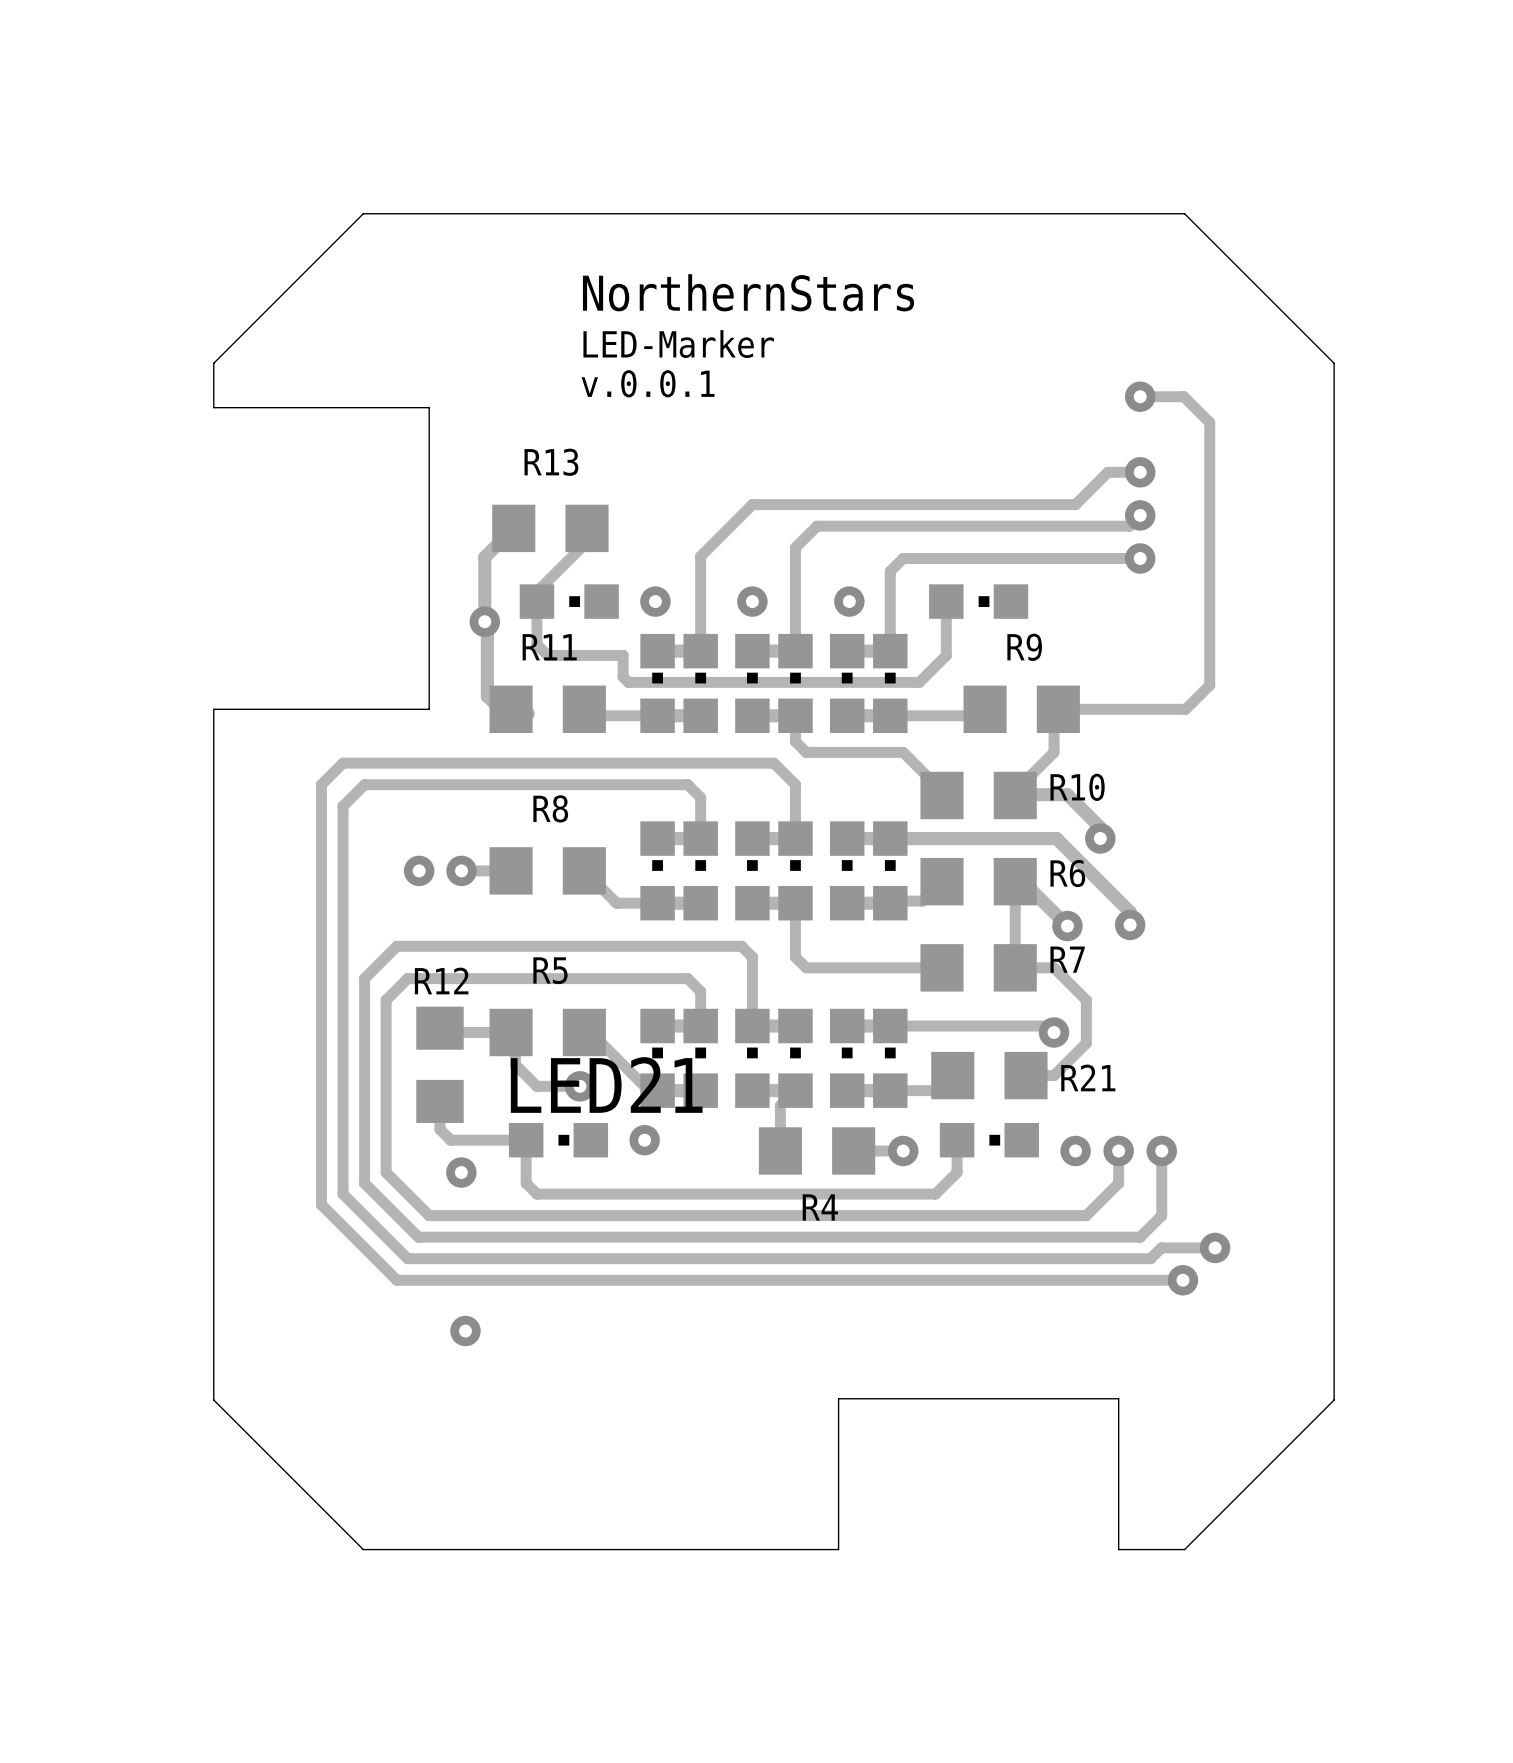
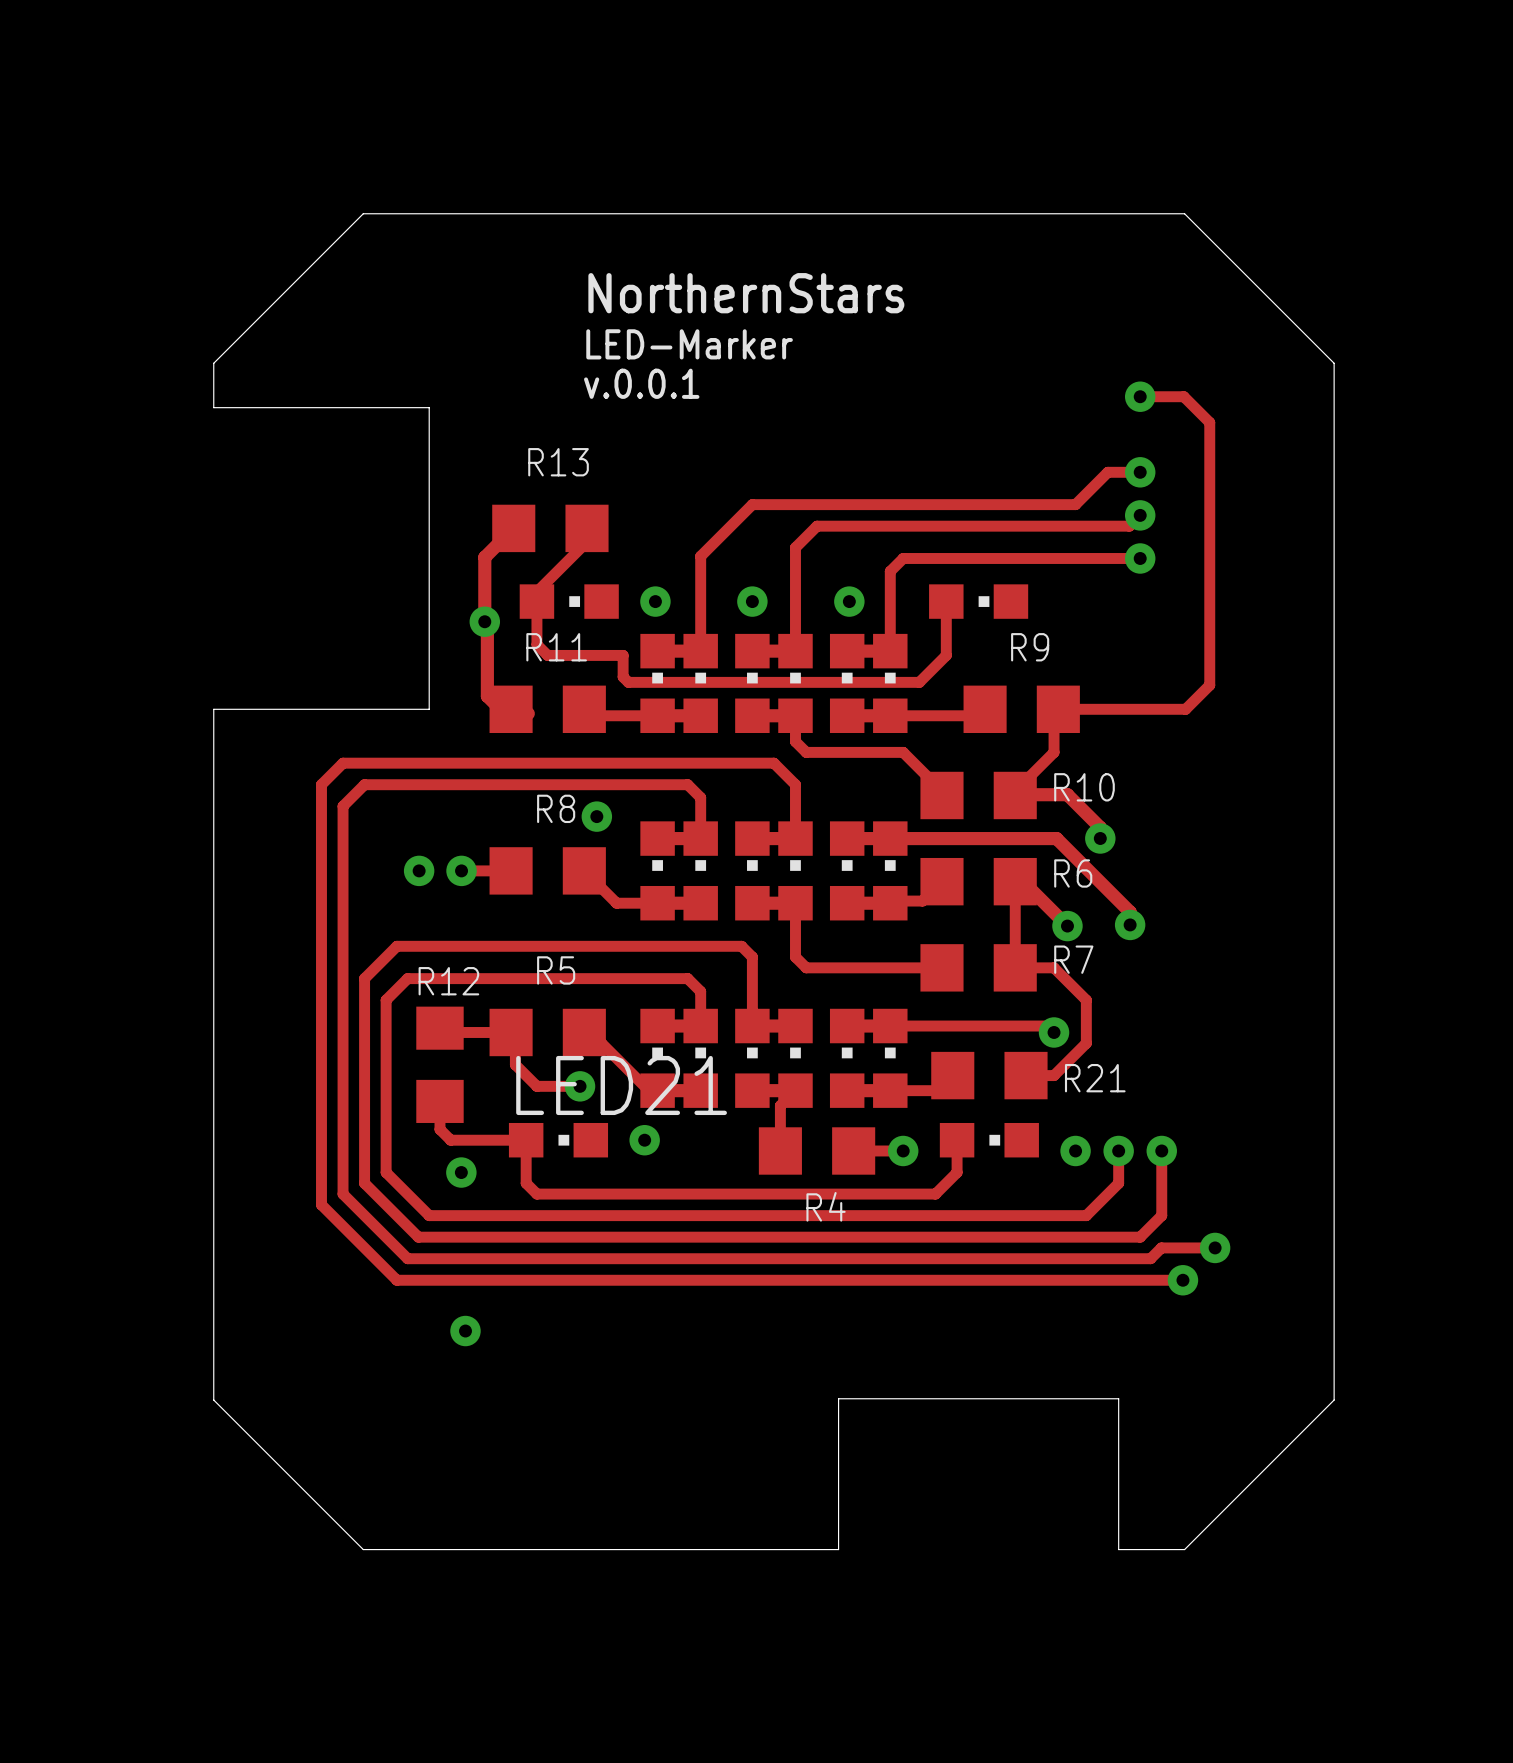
via: none -> (596, 816)

